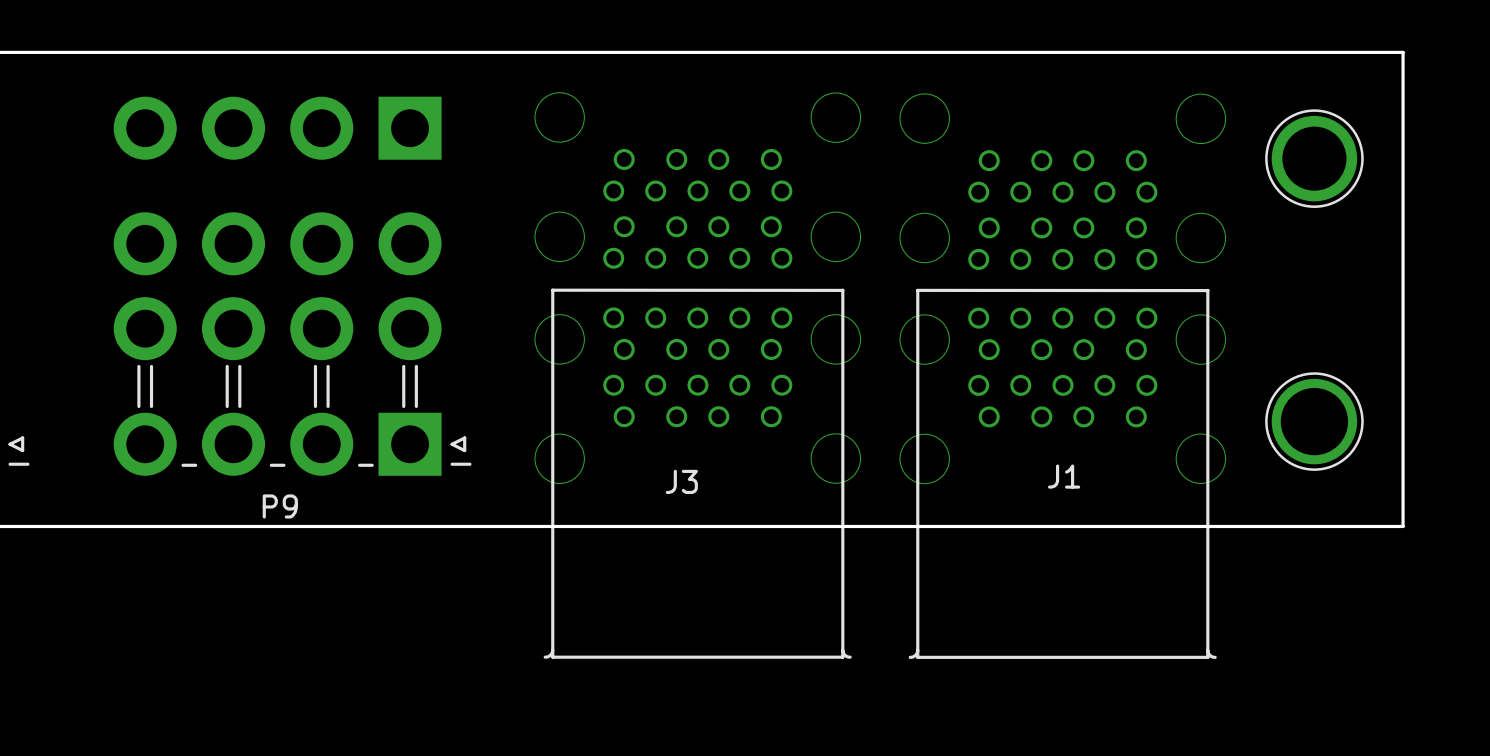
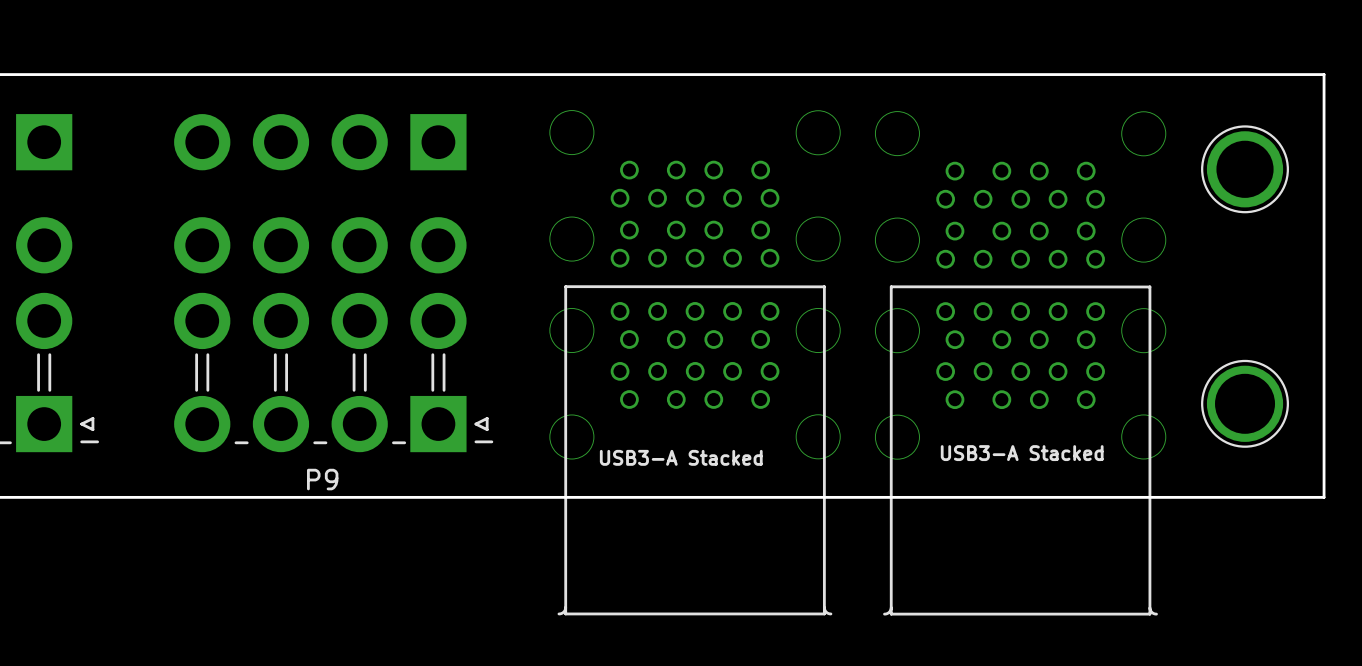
J1 name: J1 (1064, 476) -> USB3-A Stacked (1022, 453)
J3 name: J3 (681, 481) -> USB3-A Stacked (681, 457)

